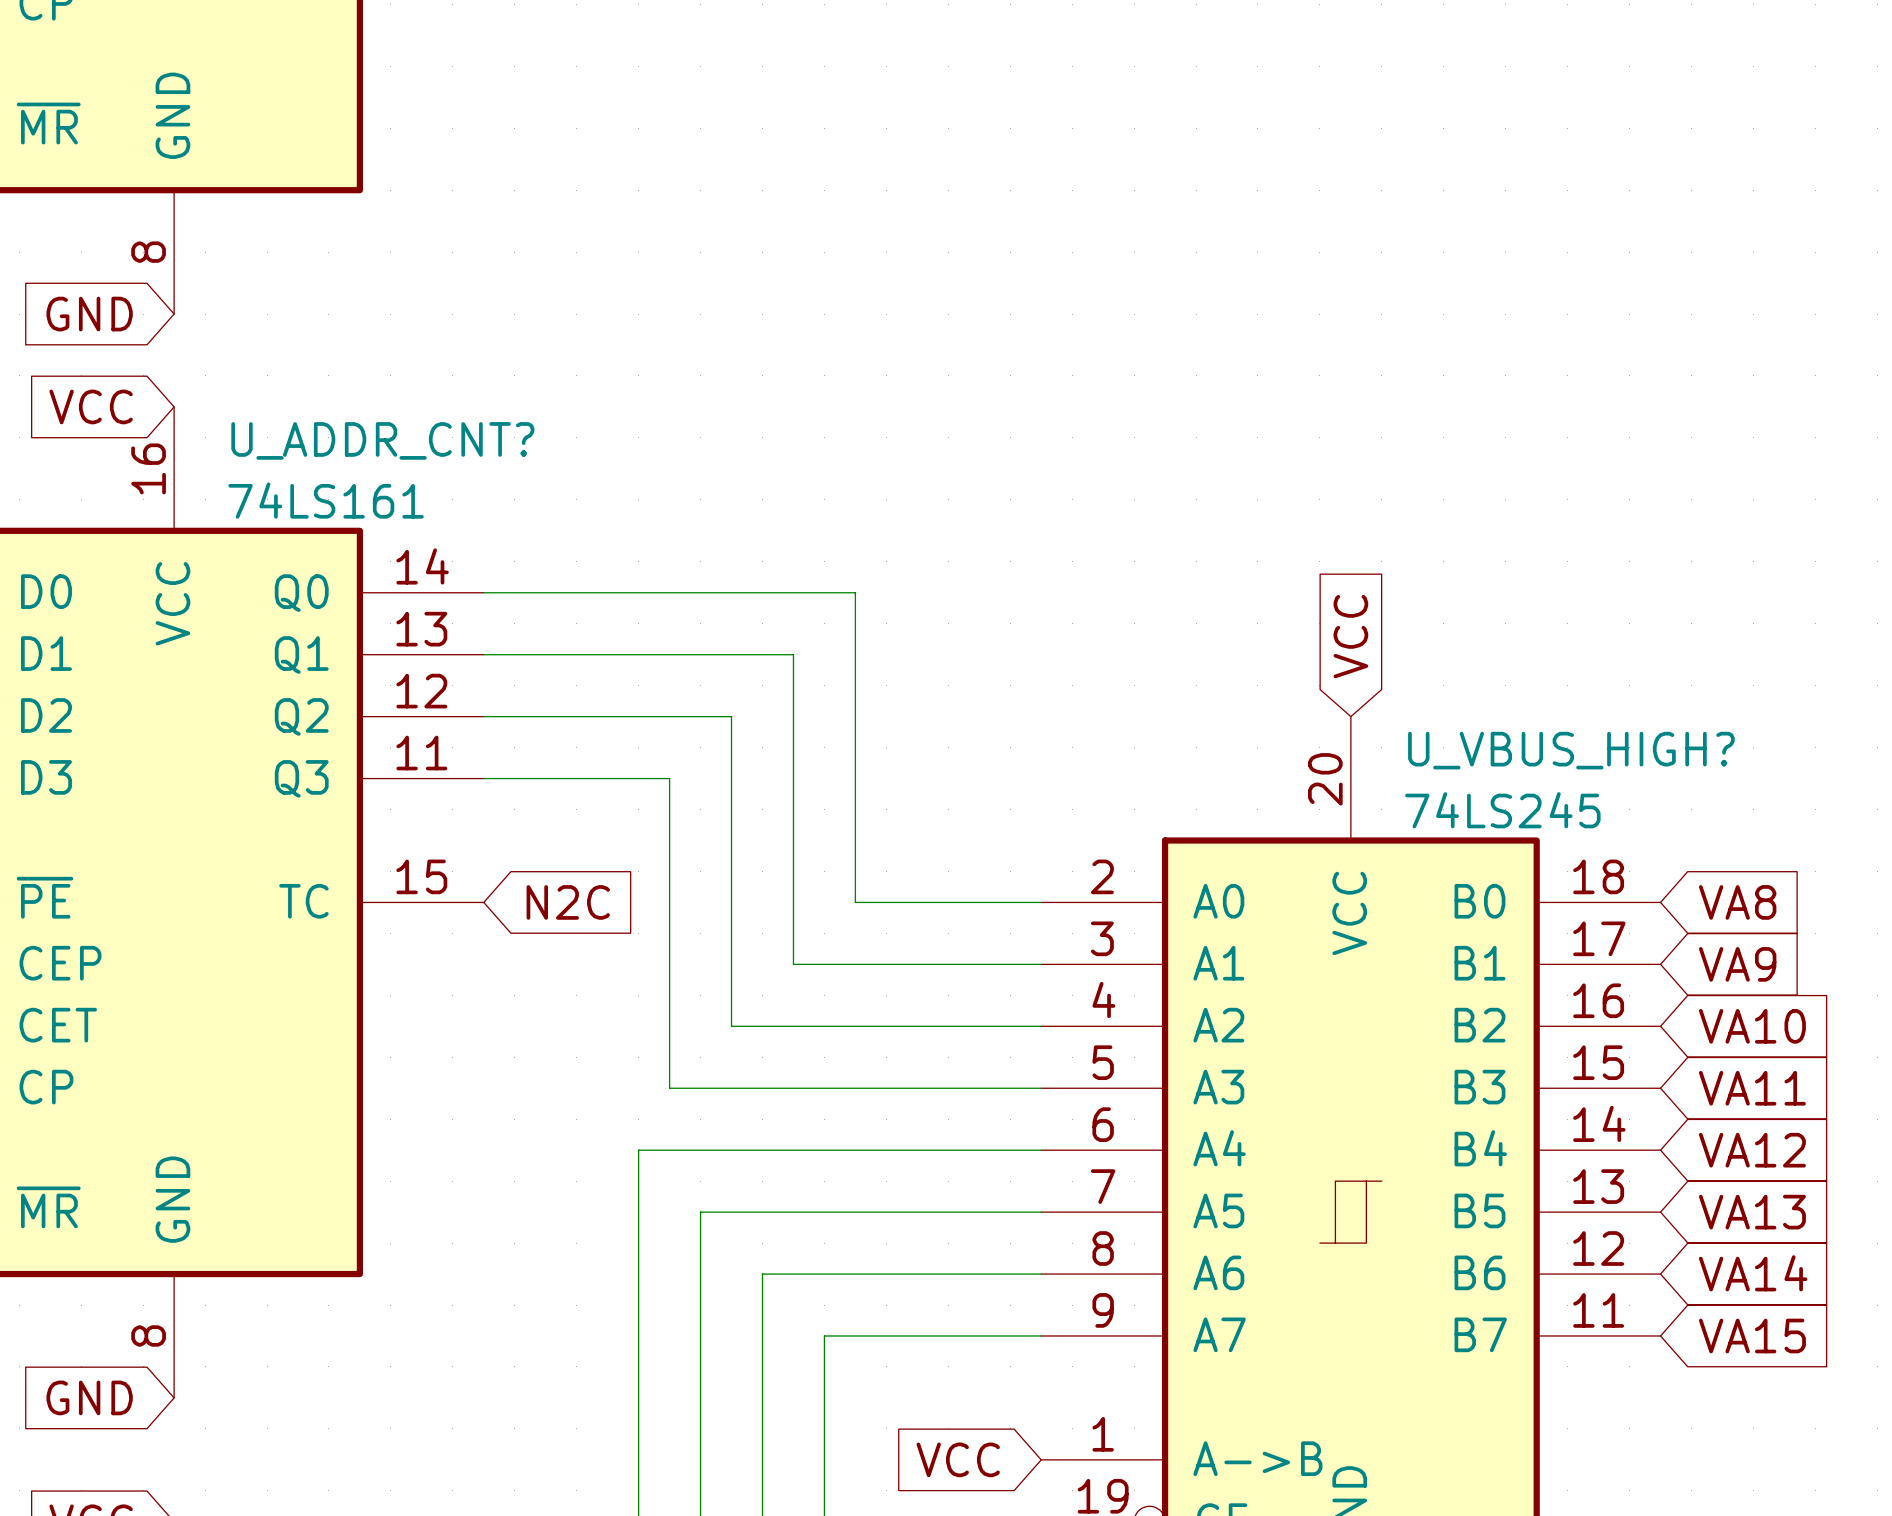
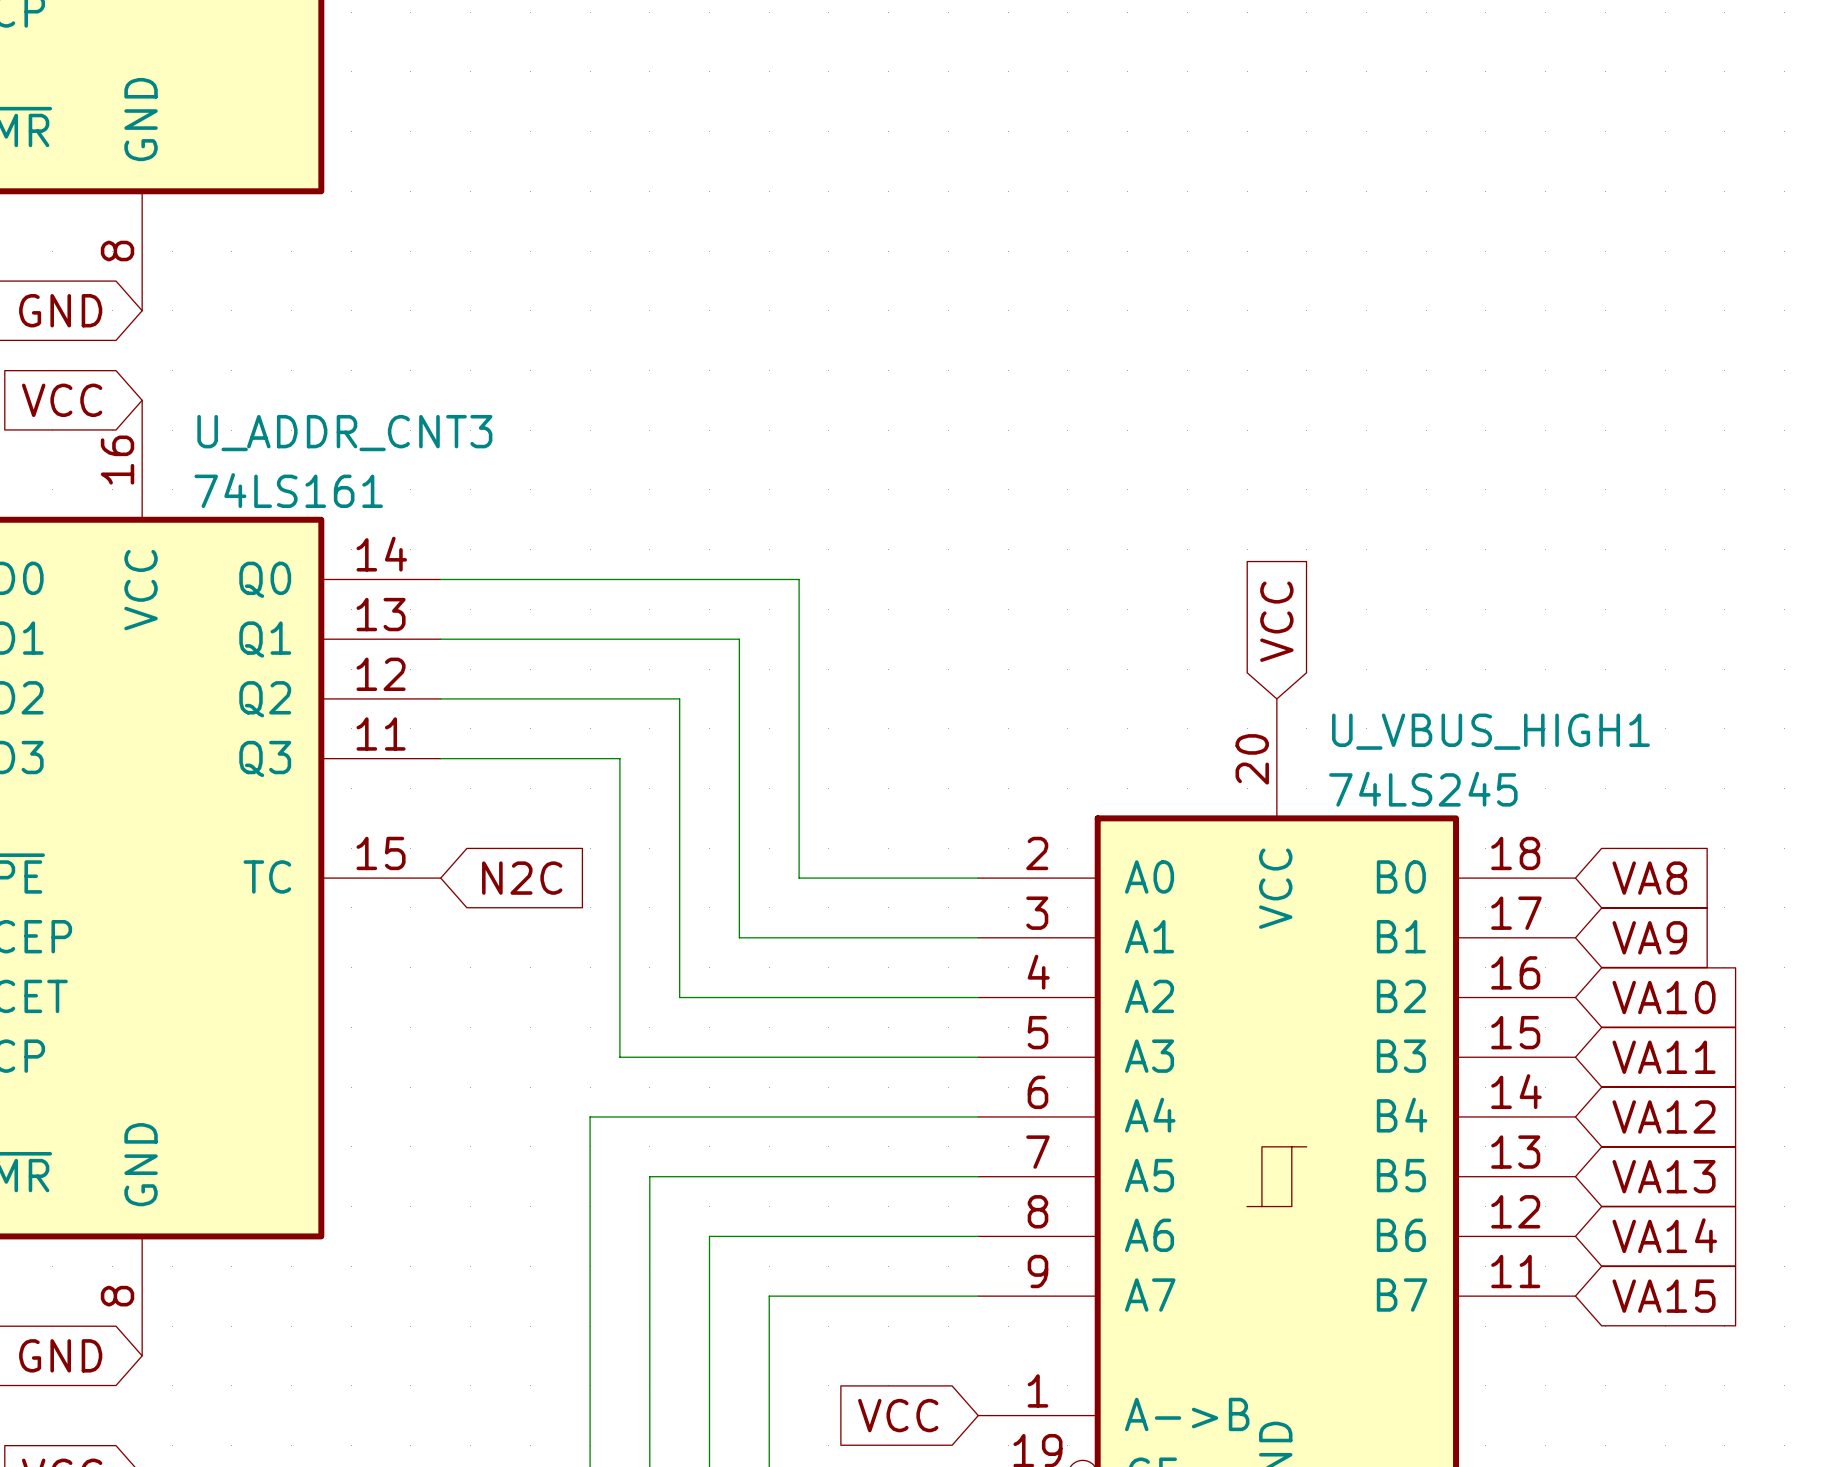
U_ADDR_CNT? name: U_ADDR_CNT? (382, 440) -> U_ADDR_CNT3 (344, 433)
U_VBUS_HIGH? name: U_VBUS_HIGH? (1571, 750) -> U_VBUS_HIGH1 (1490, 731)

